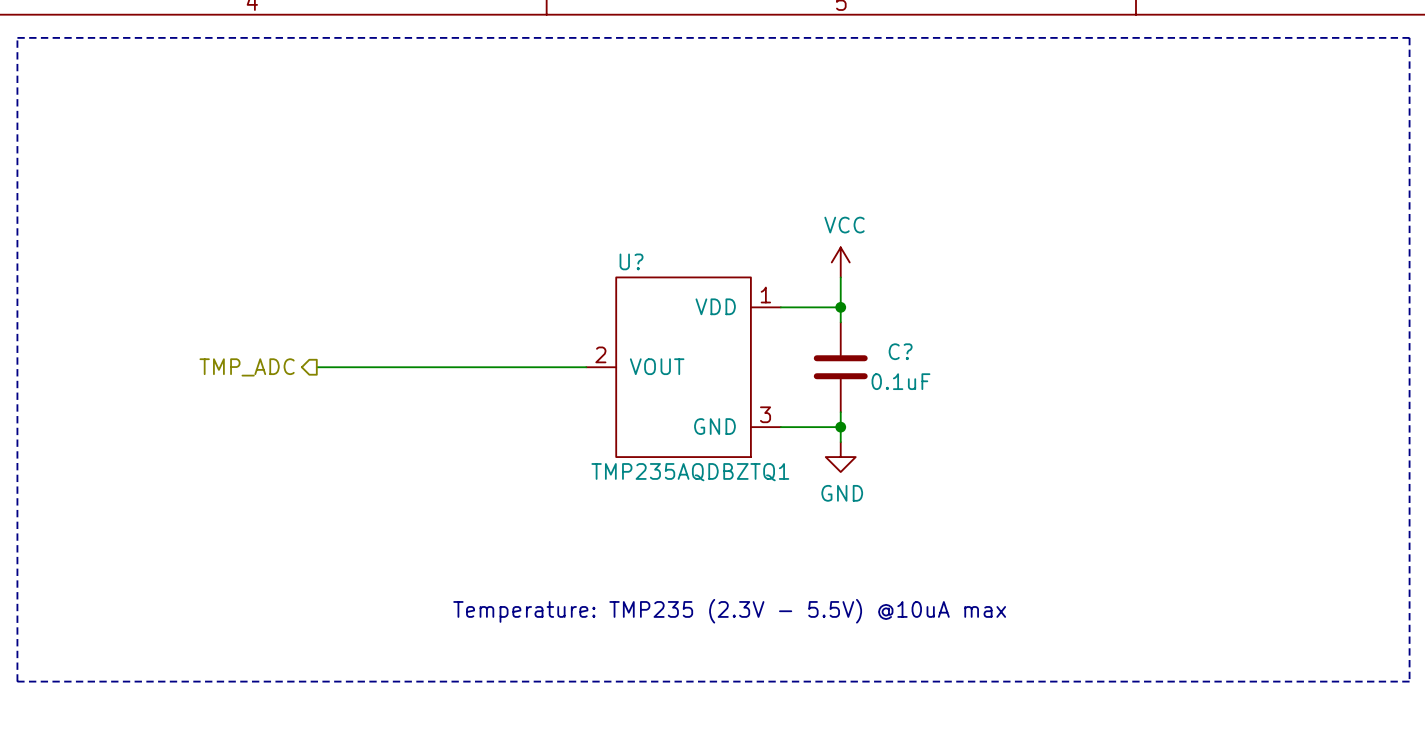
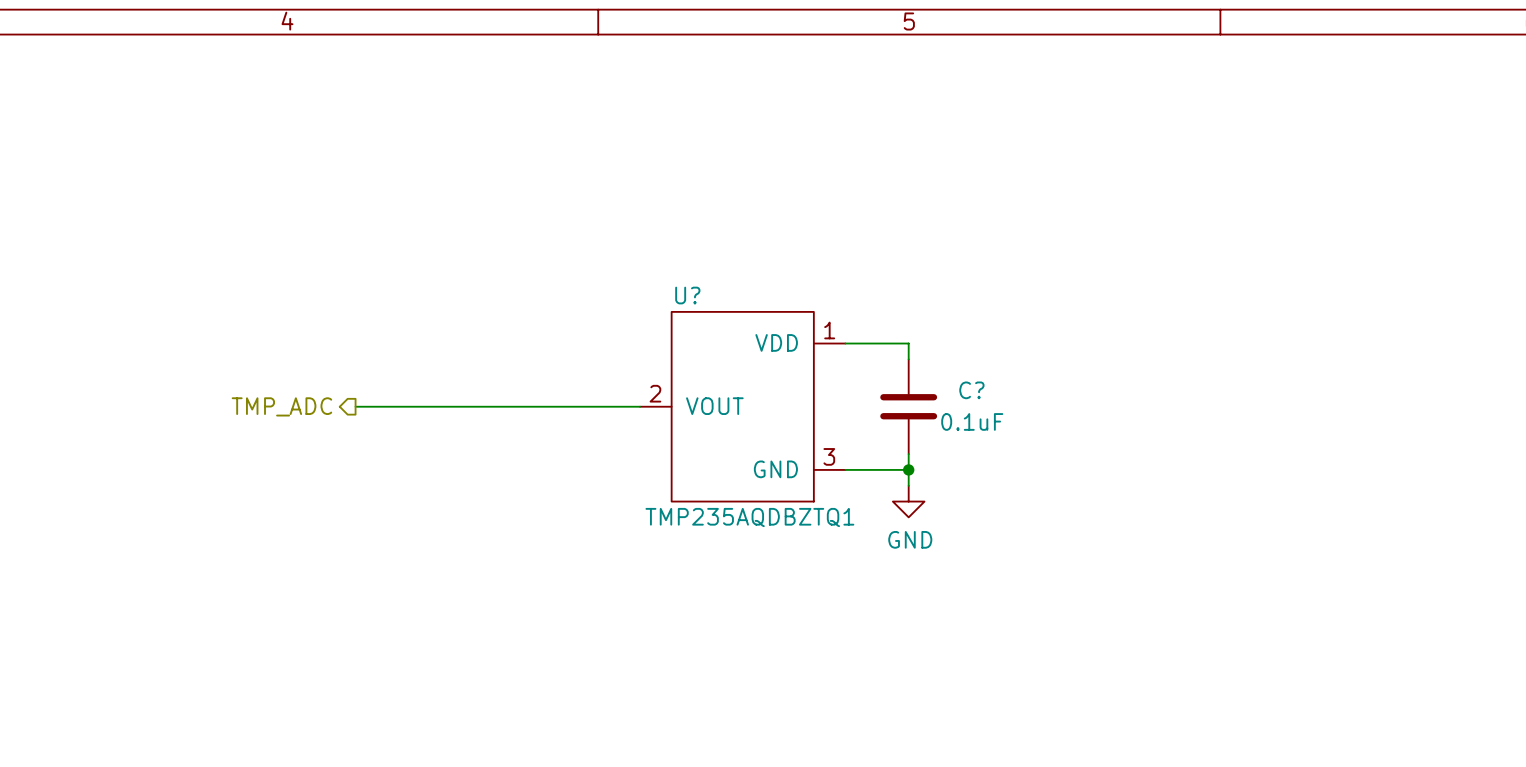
line: (17, 37) (17, 681) (1409, 681) (1409, 37) (17, 37) -> none
power symbol: VCC (840, 262) -> none
wire: (840, 277) (840, 307) -> none
junction: (840, 307) -> none
text: Temperature: TMP235 (2.3V - 5.5V) @10uA max (729, 611) -> none

